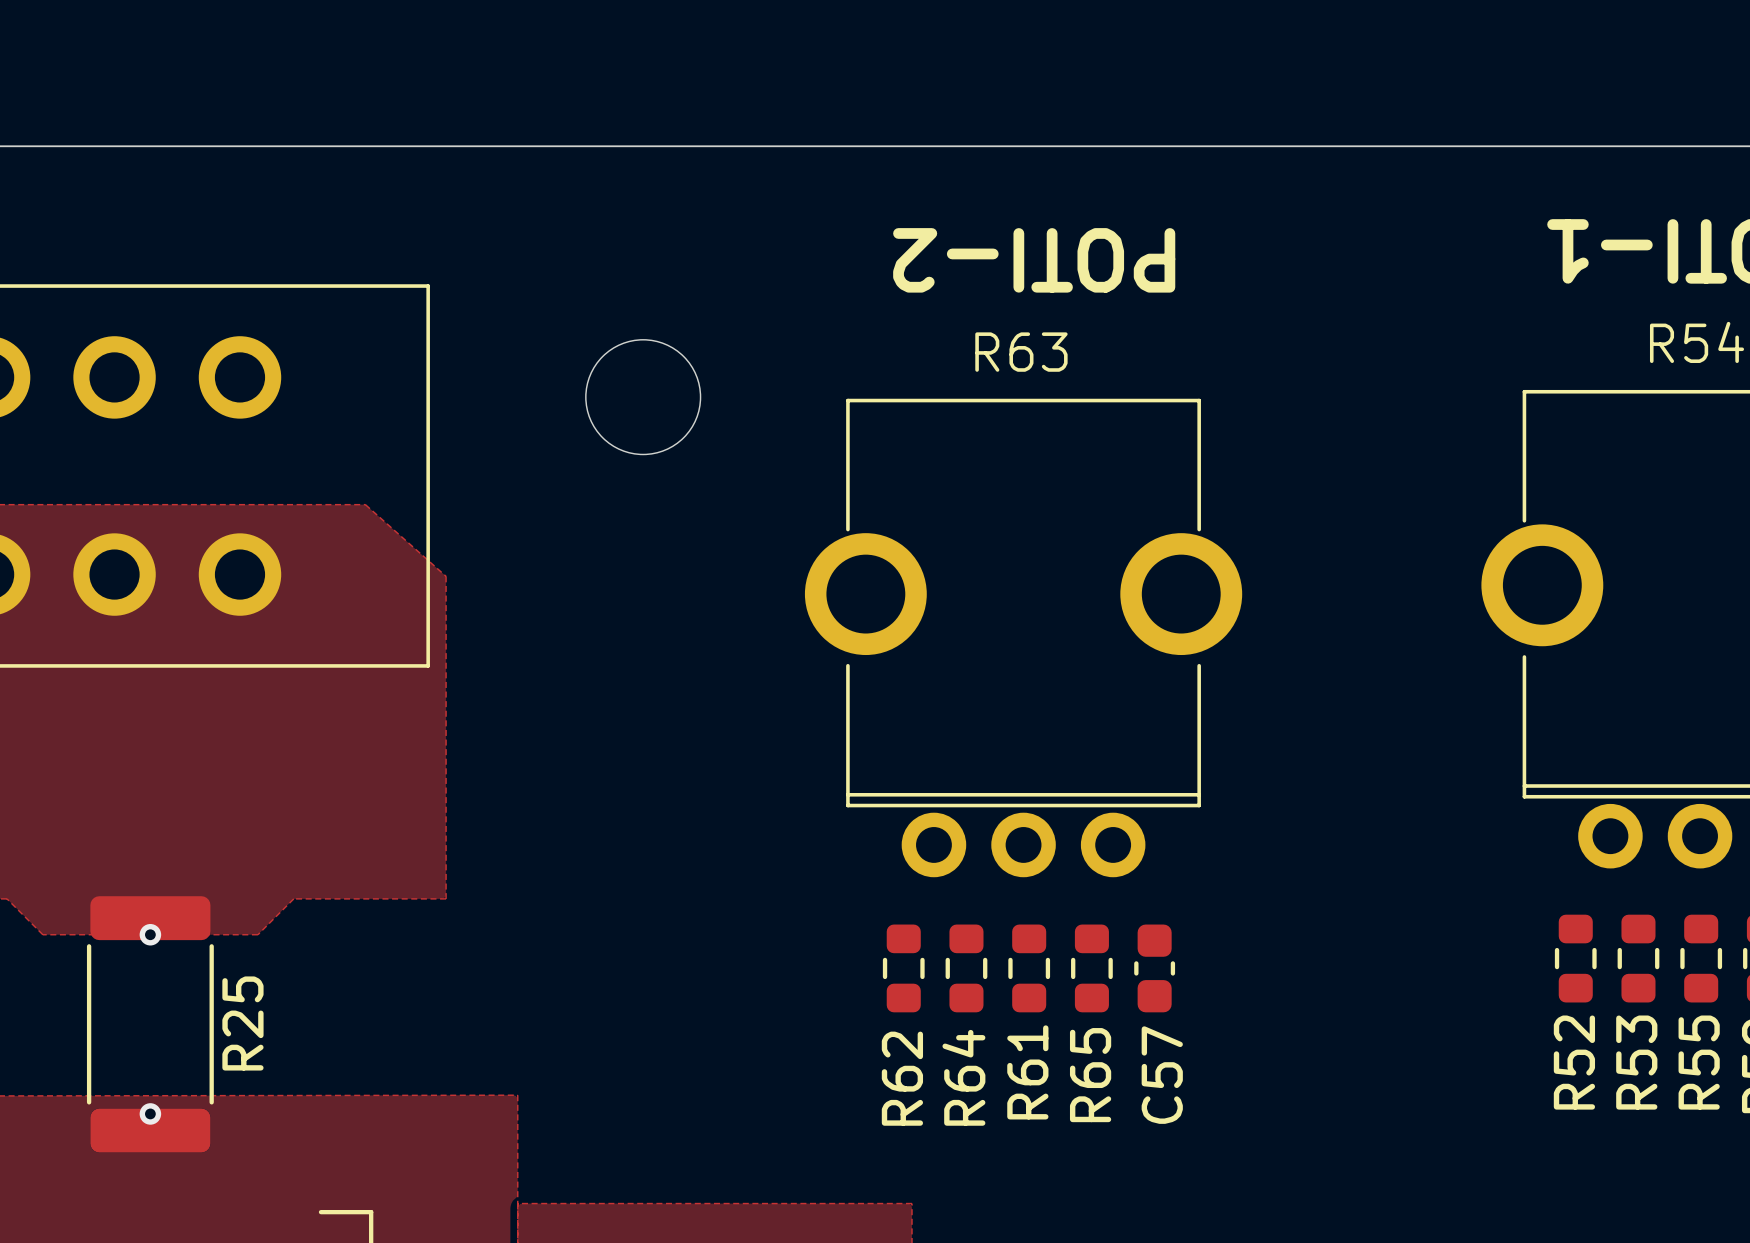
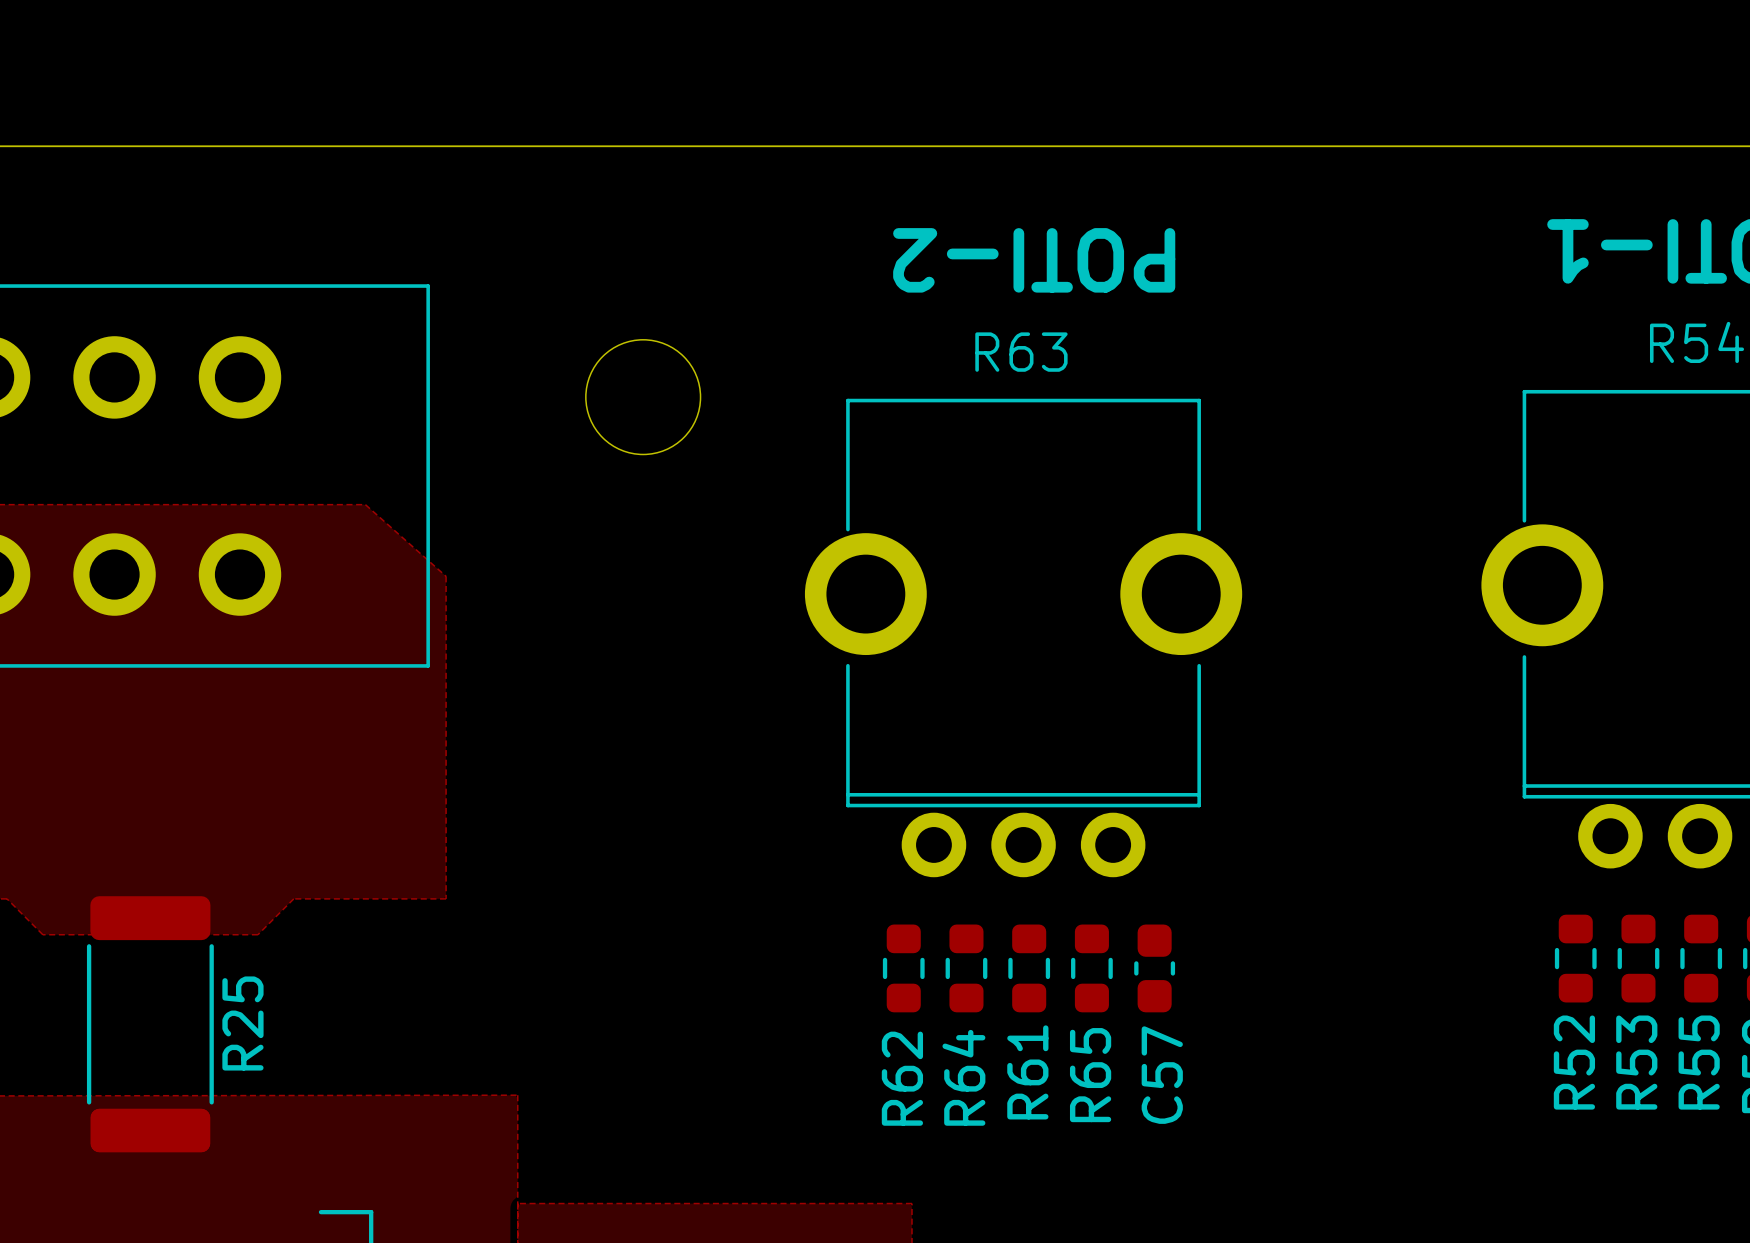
via: (150, 934) -> none
via: (150, 1113) -> none

